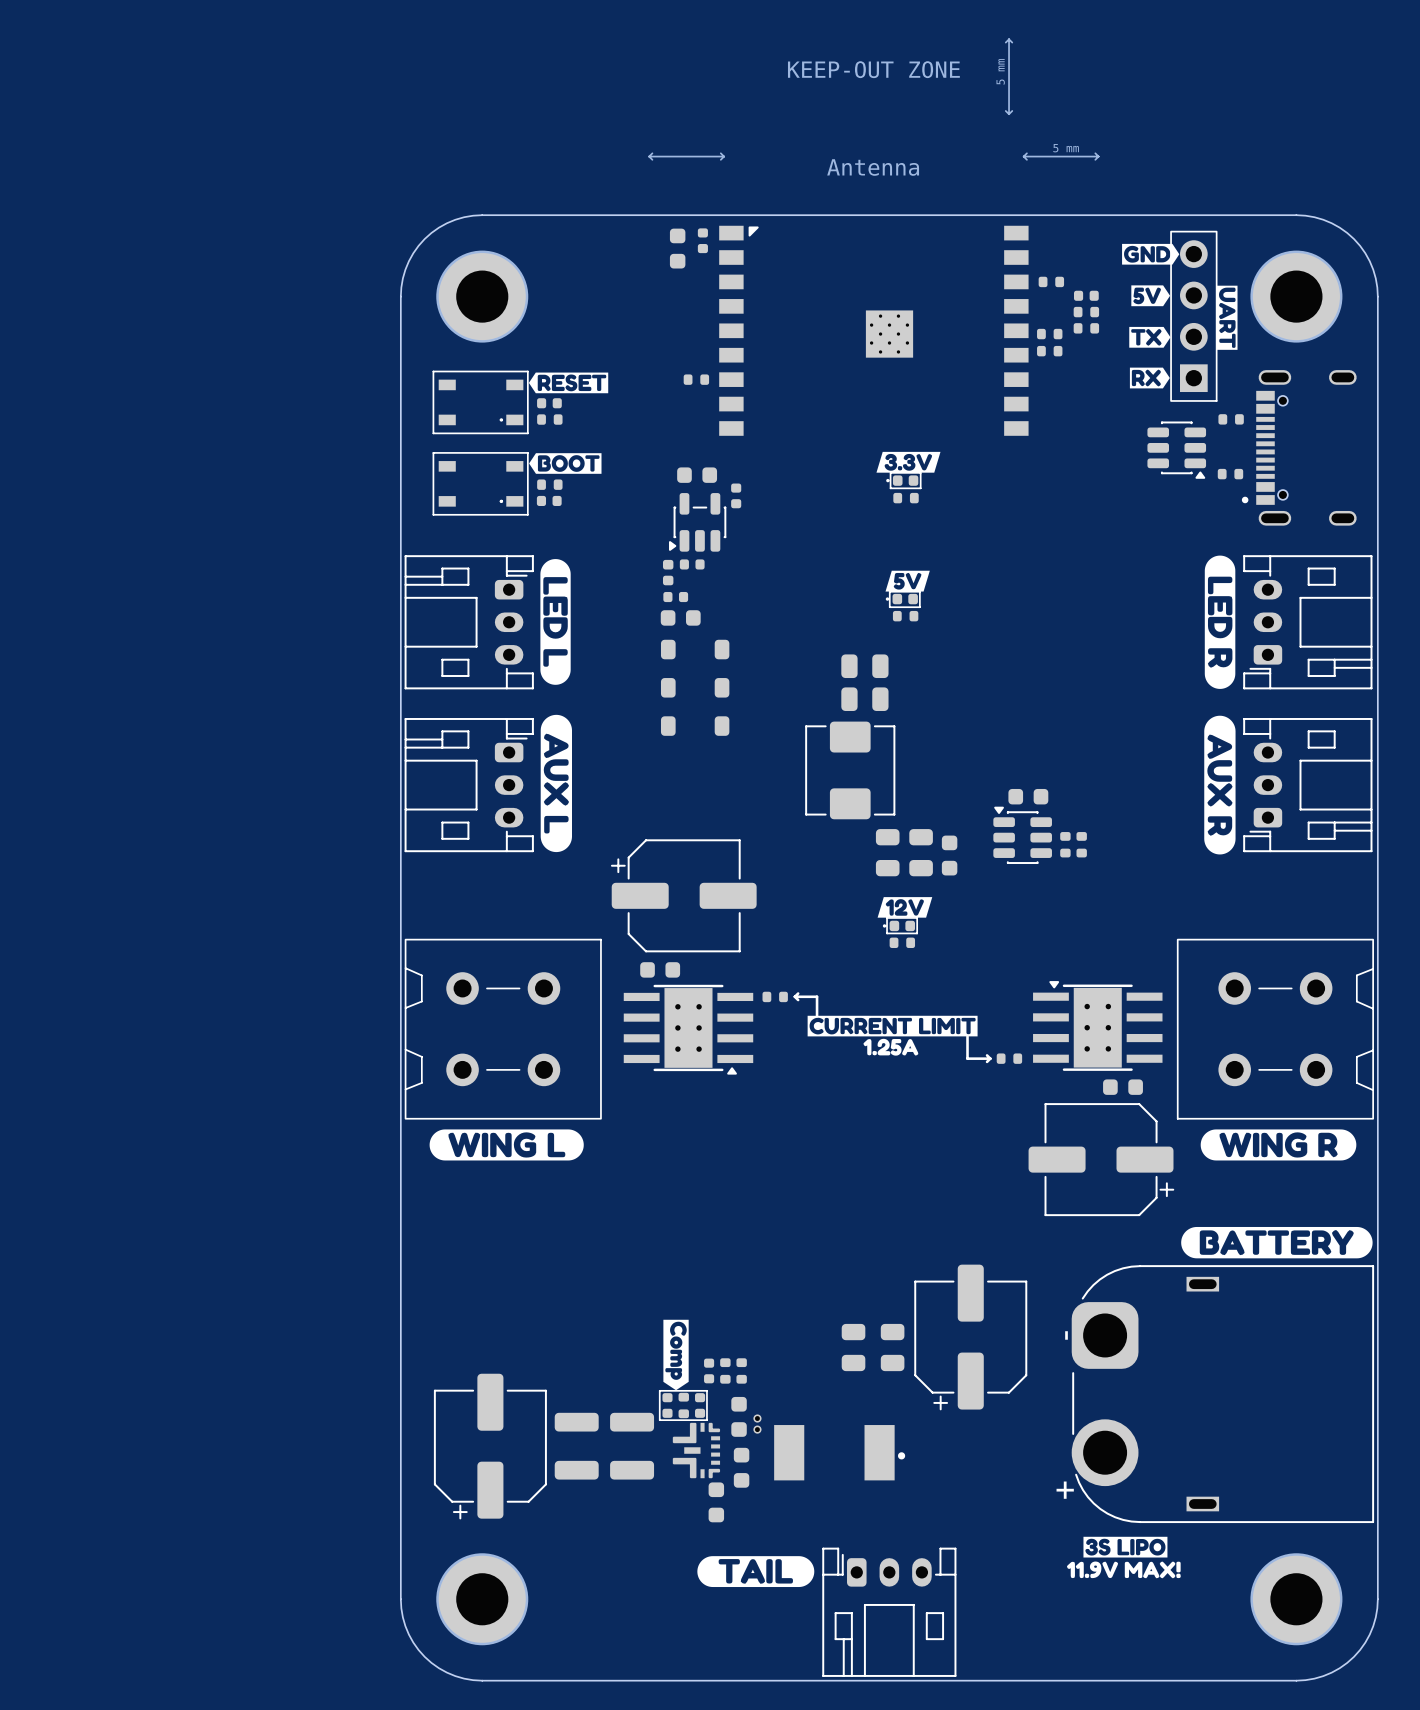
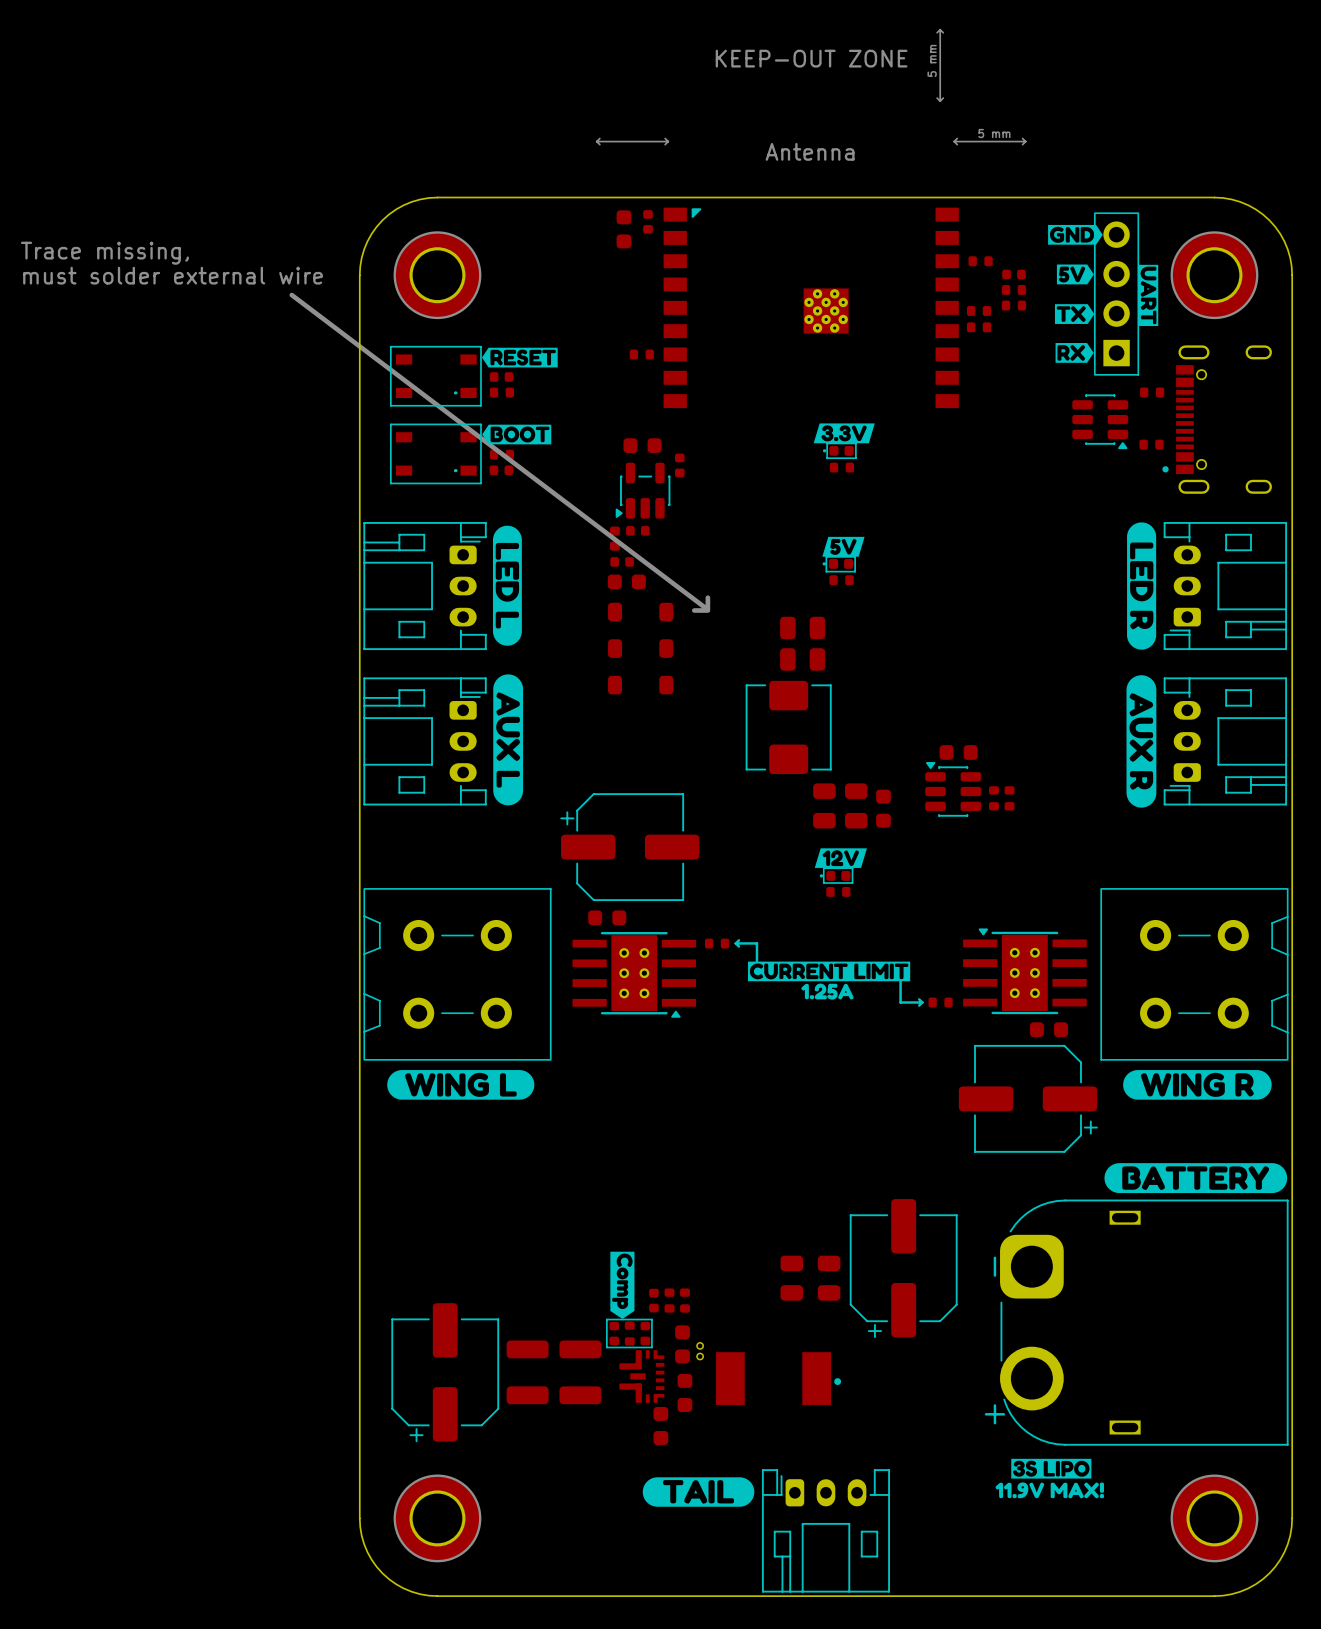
text: none -> Trace missing, (104, 253)
text: none -> must solder external wire (173, 275)
line: none -> (291, 295) (707, 609)
line: none -> (707, 597) (707, 609)
line: none -> (694, 610) (707, 610)

